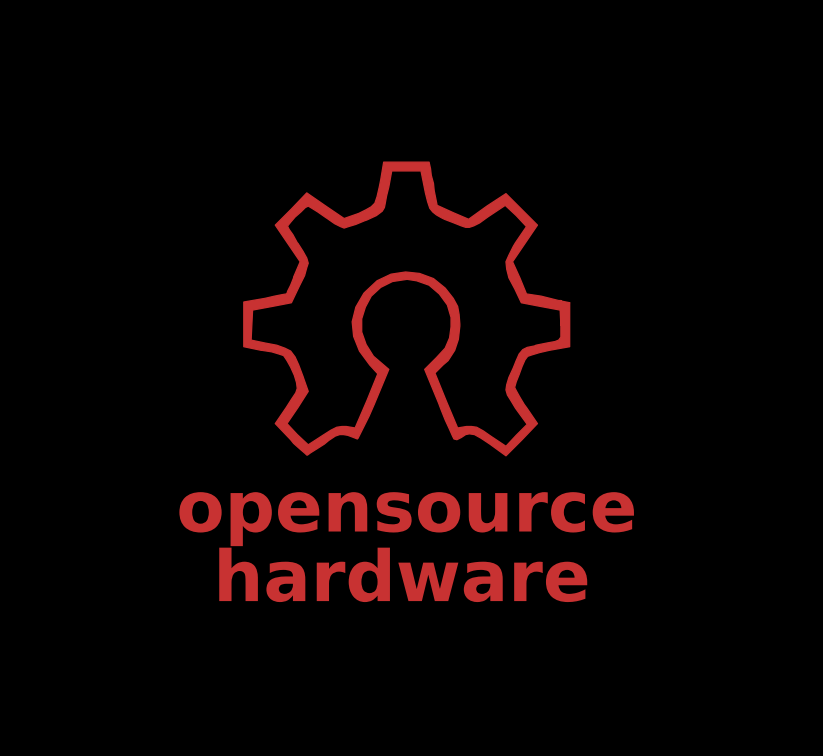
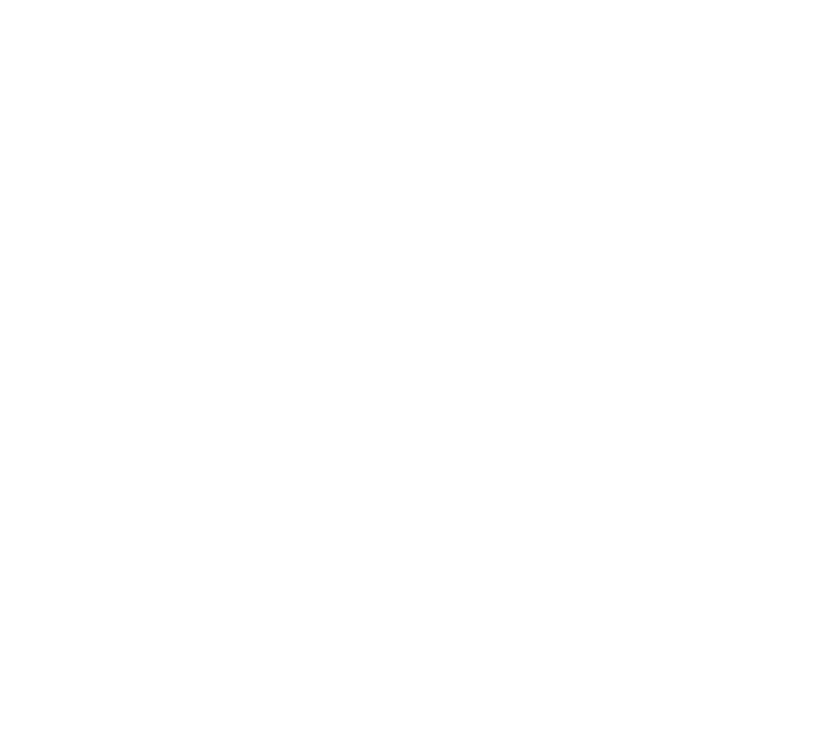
power symbol: (406, 308) -> none

